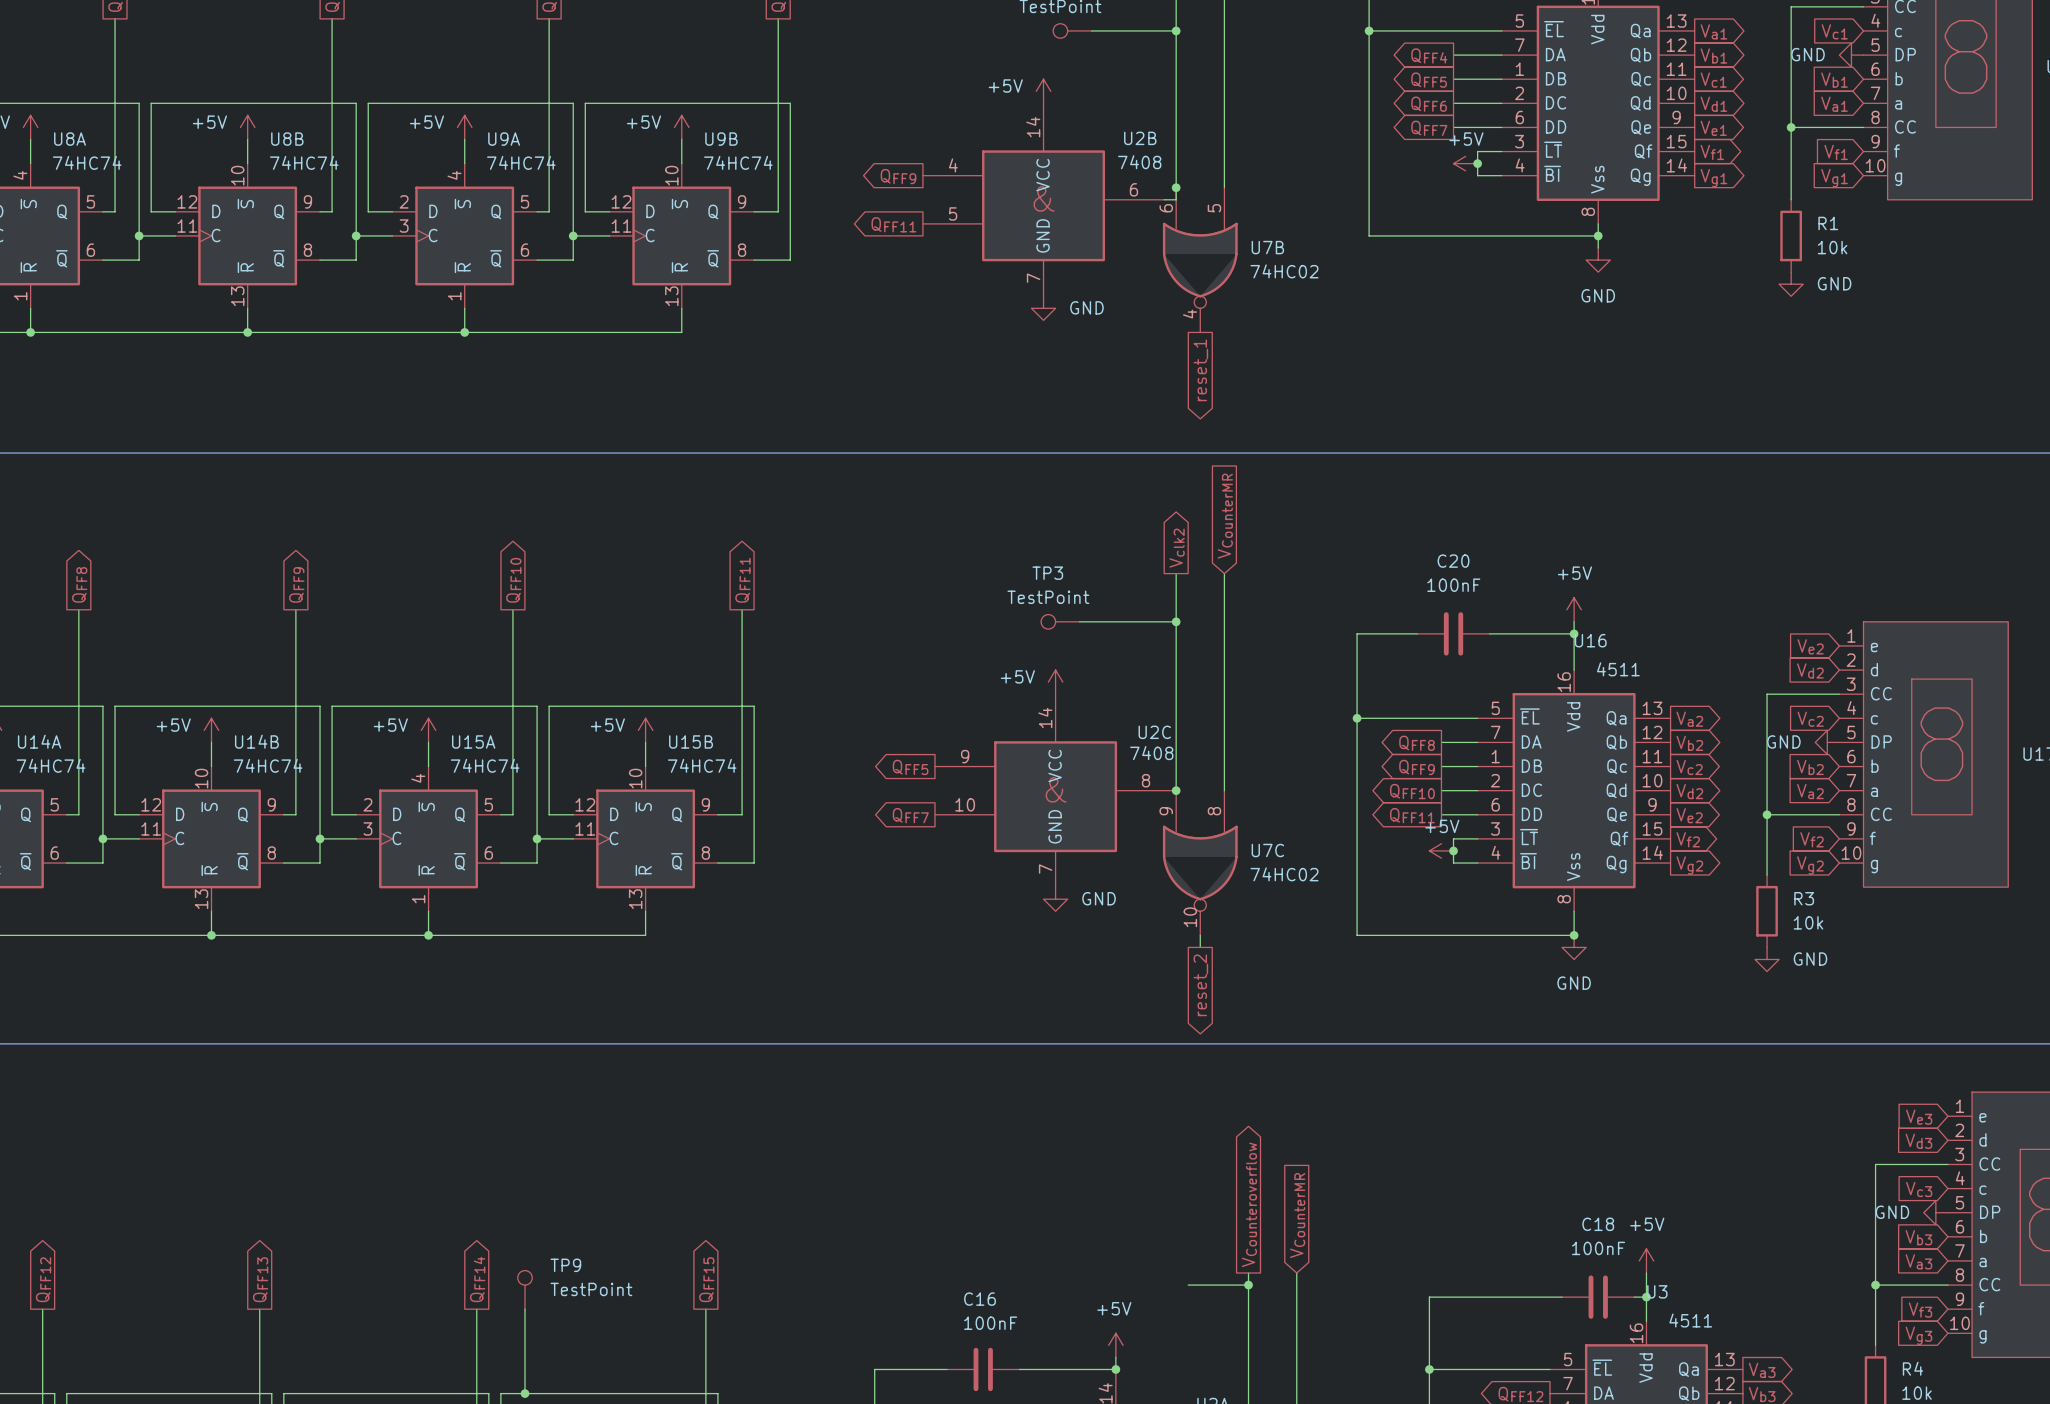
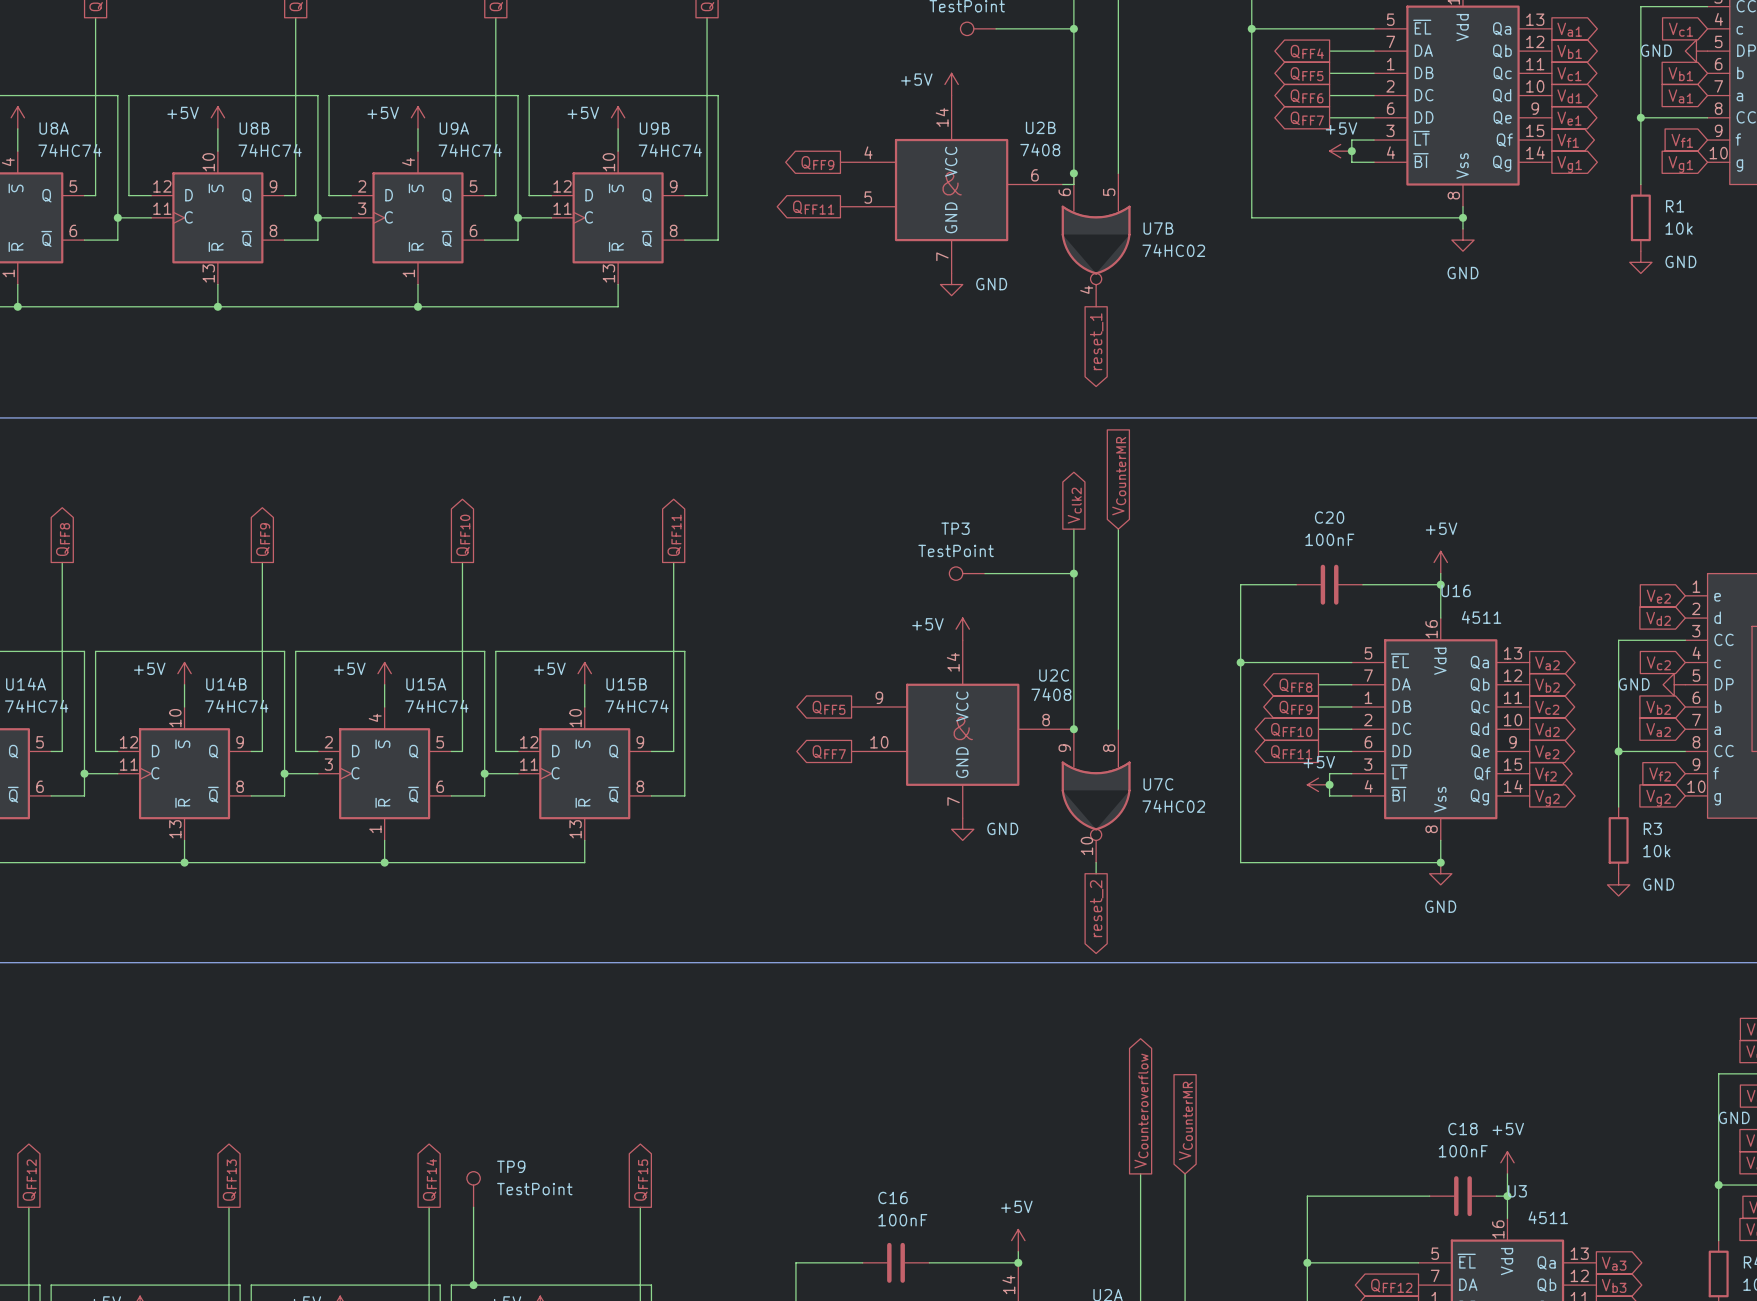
wire: (1188, 1285) (1248, 1285) -> none
junction: (1248, 1285) -> none

